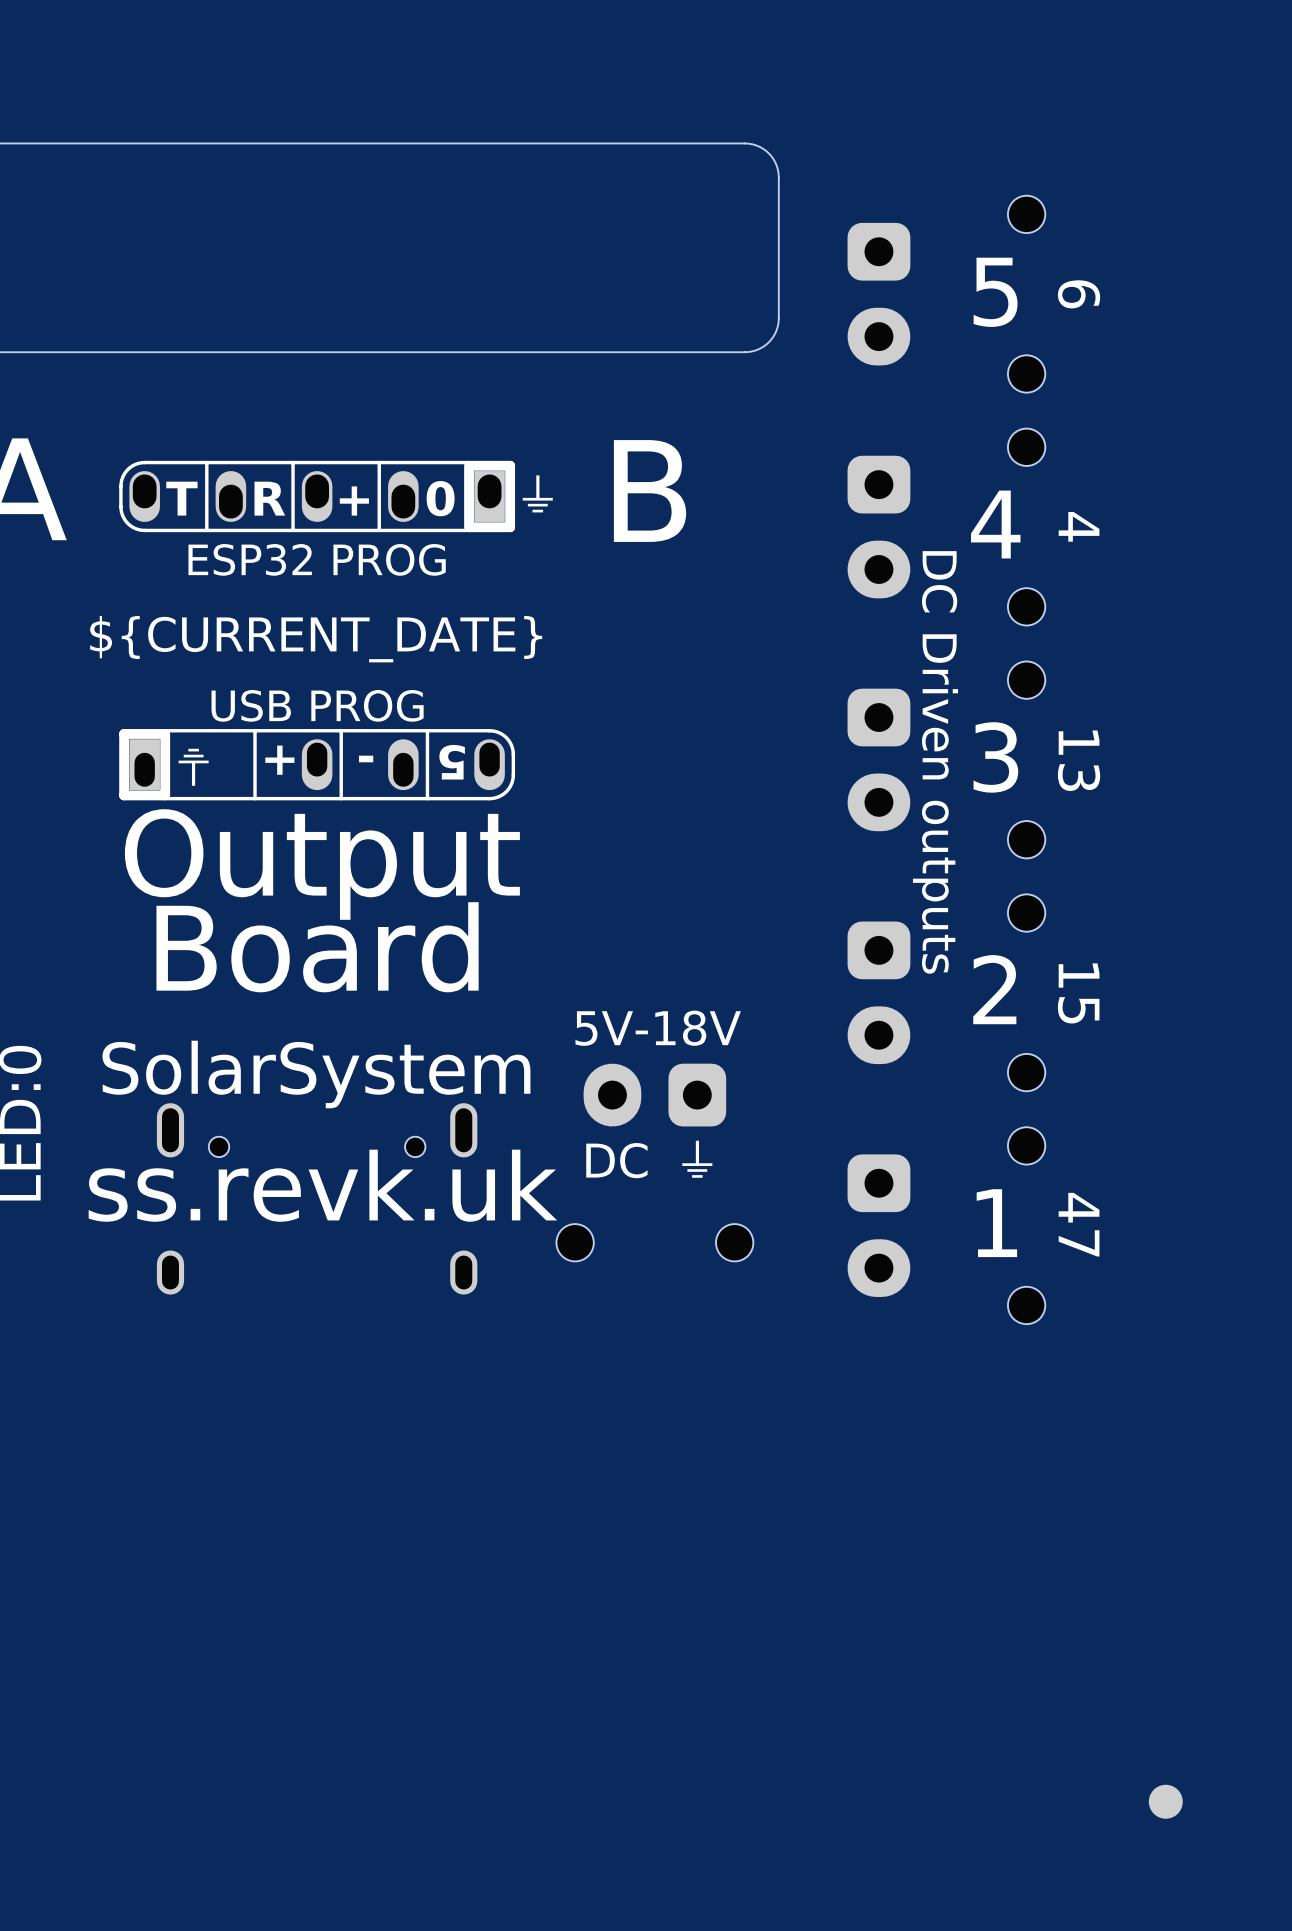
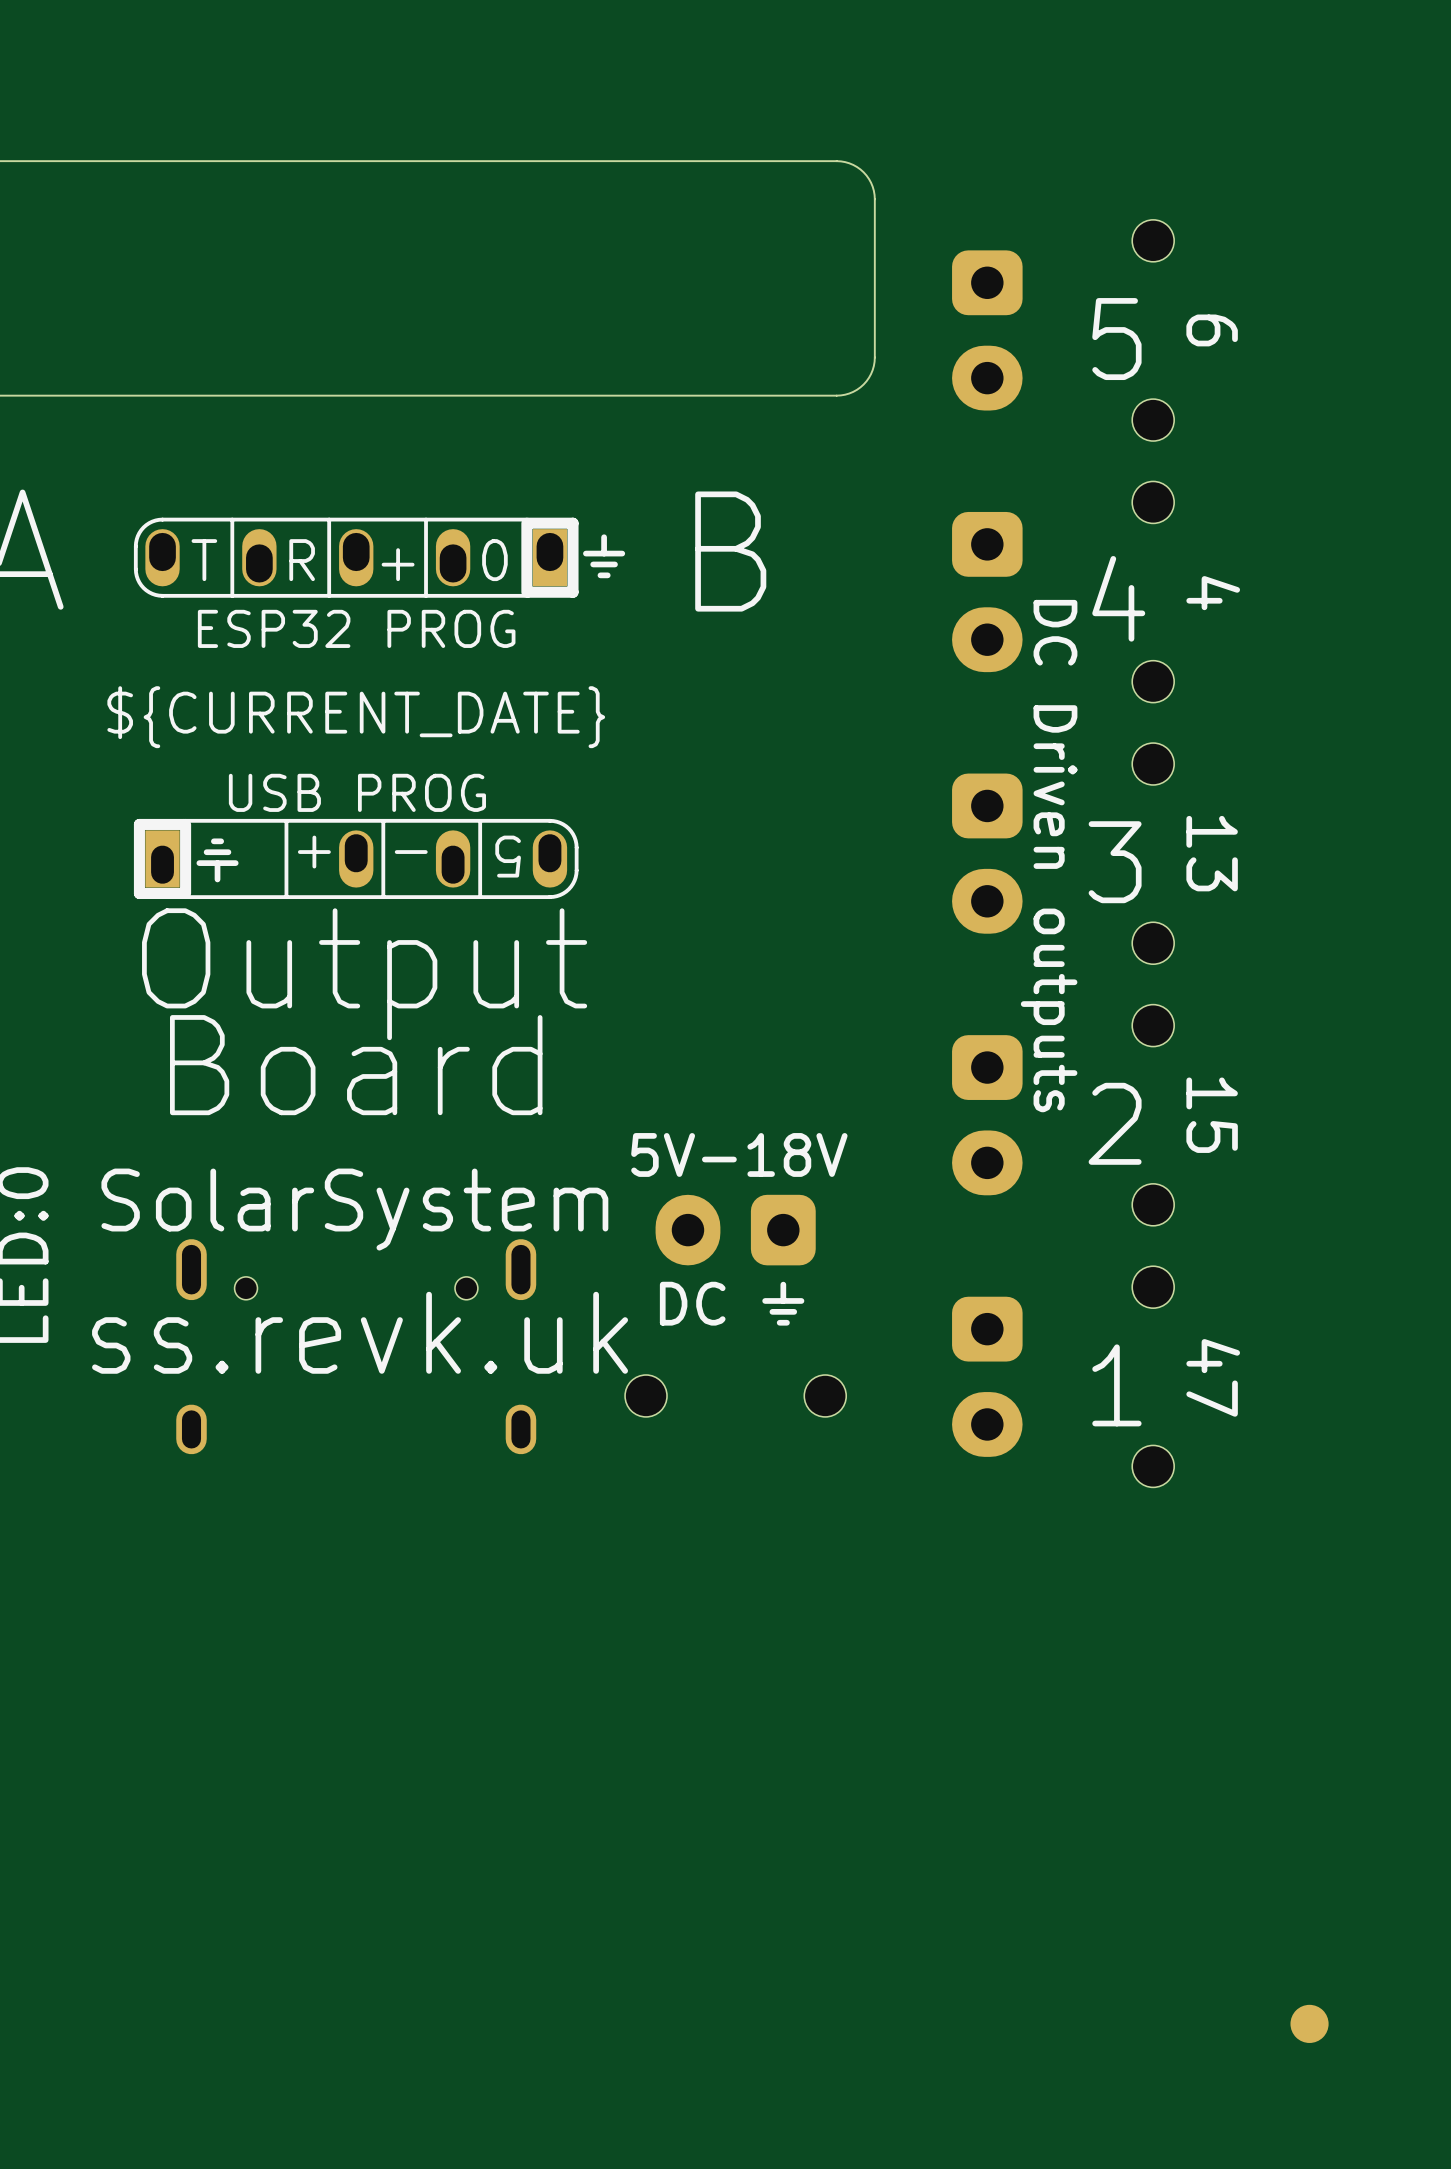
text position: 5 (995, 292) -> 5 (1116, 339)
text position: 4 (995, 524) -> 4 (1118, 598)
text position: 3 (995, 757) -> 3 (1115, 862)
text position: 2 (994, 989) -> 2 (1115, 1123)
text position: 1 (996, 1223) -> 1 (1116, 1385)

